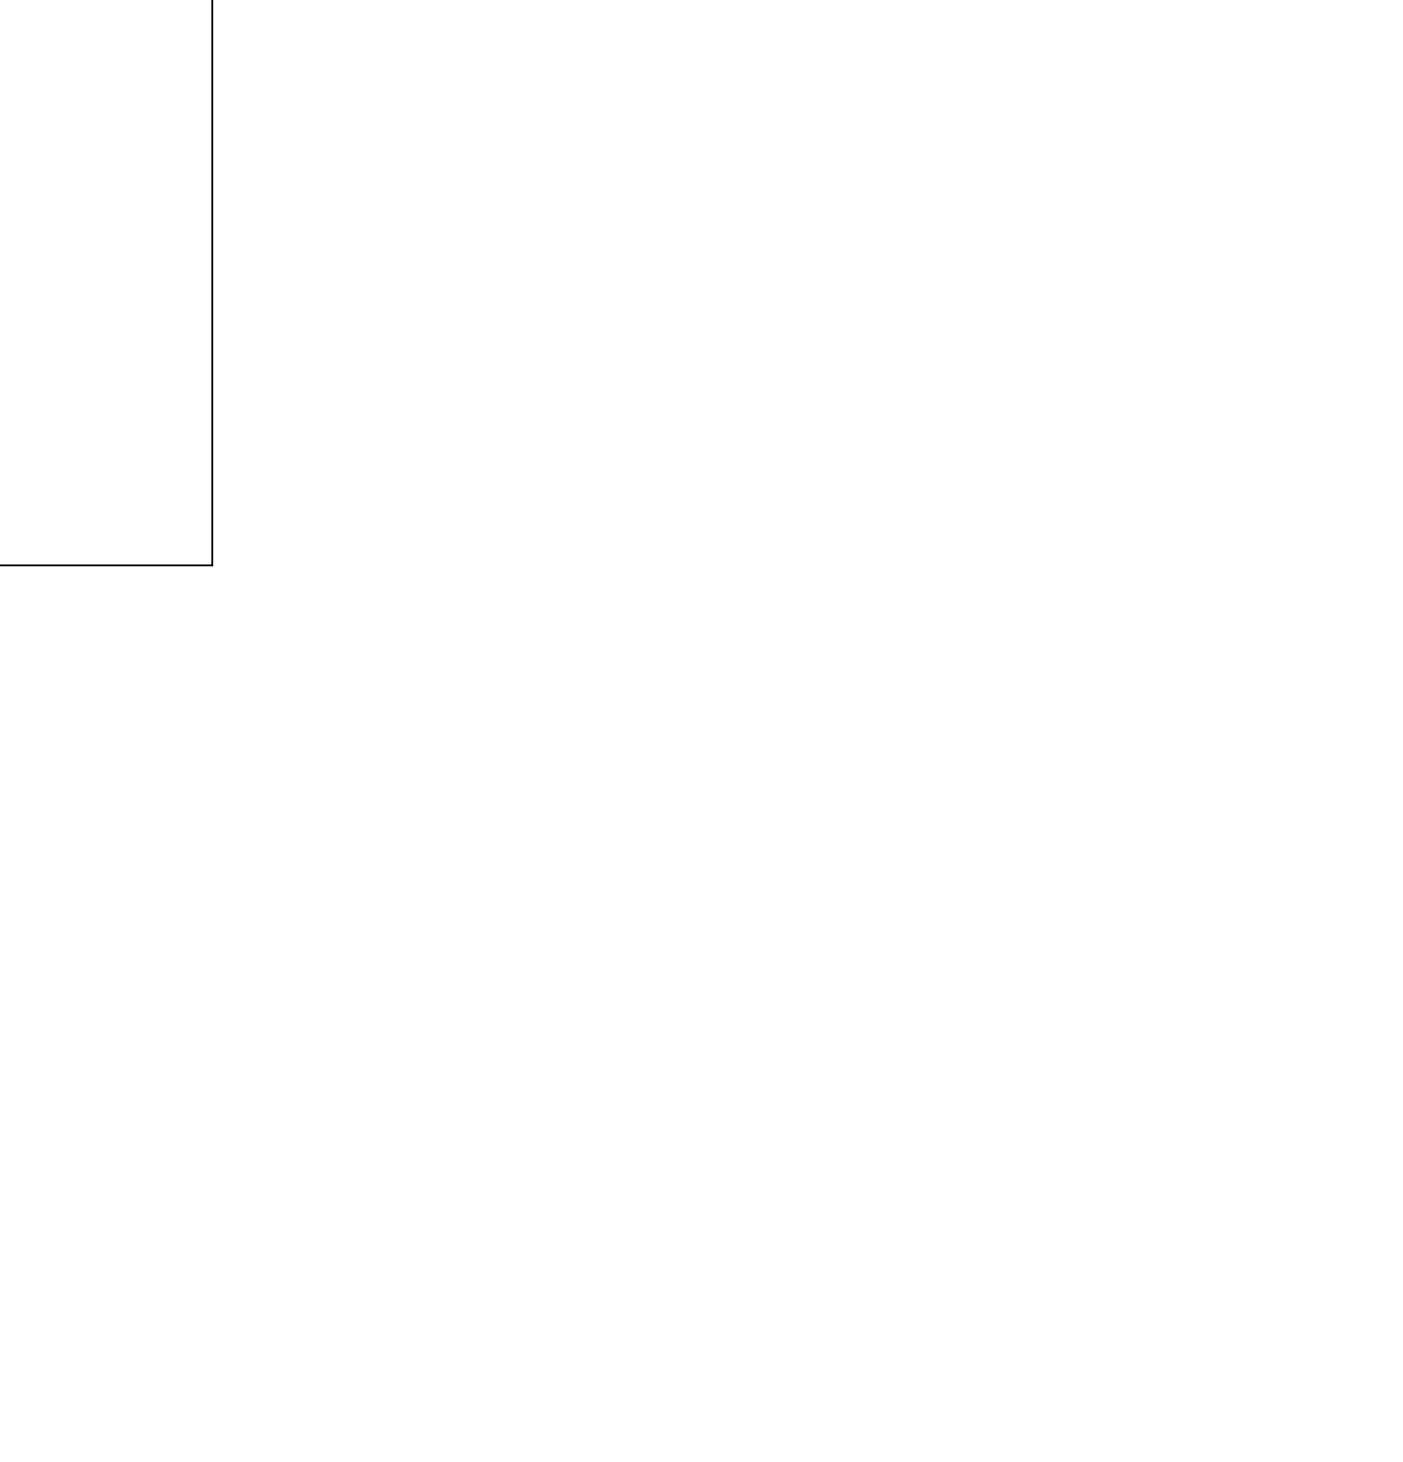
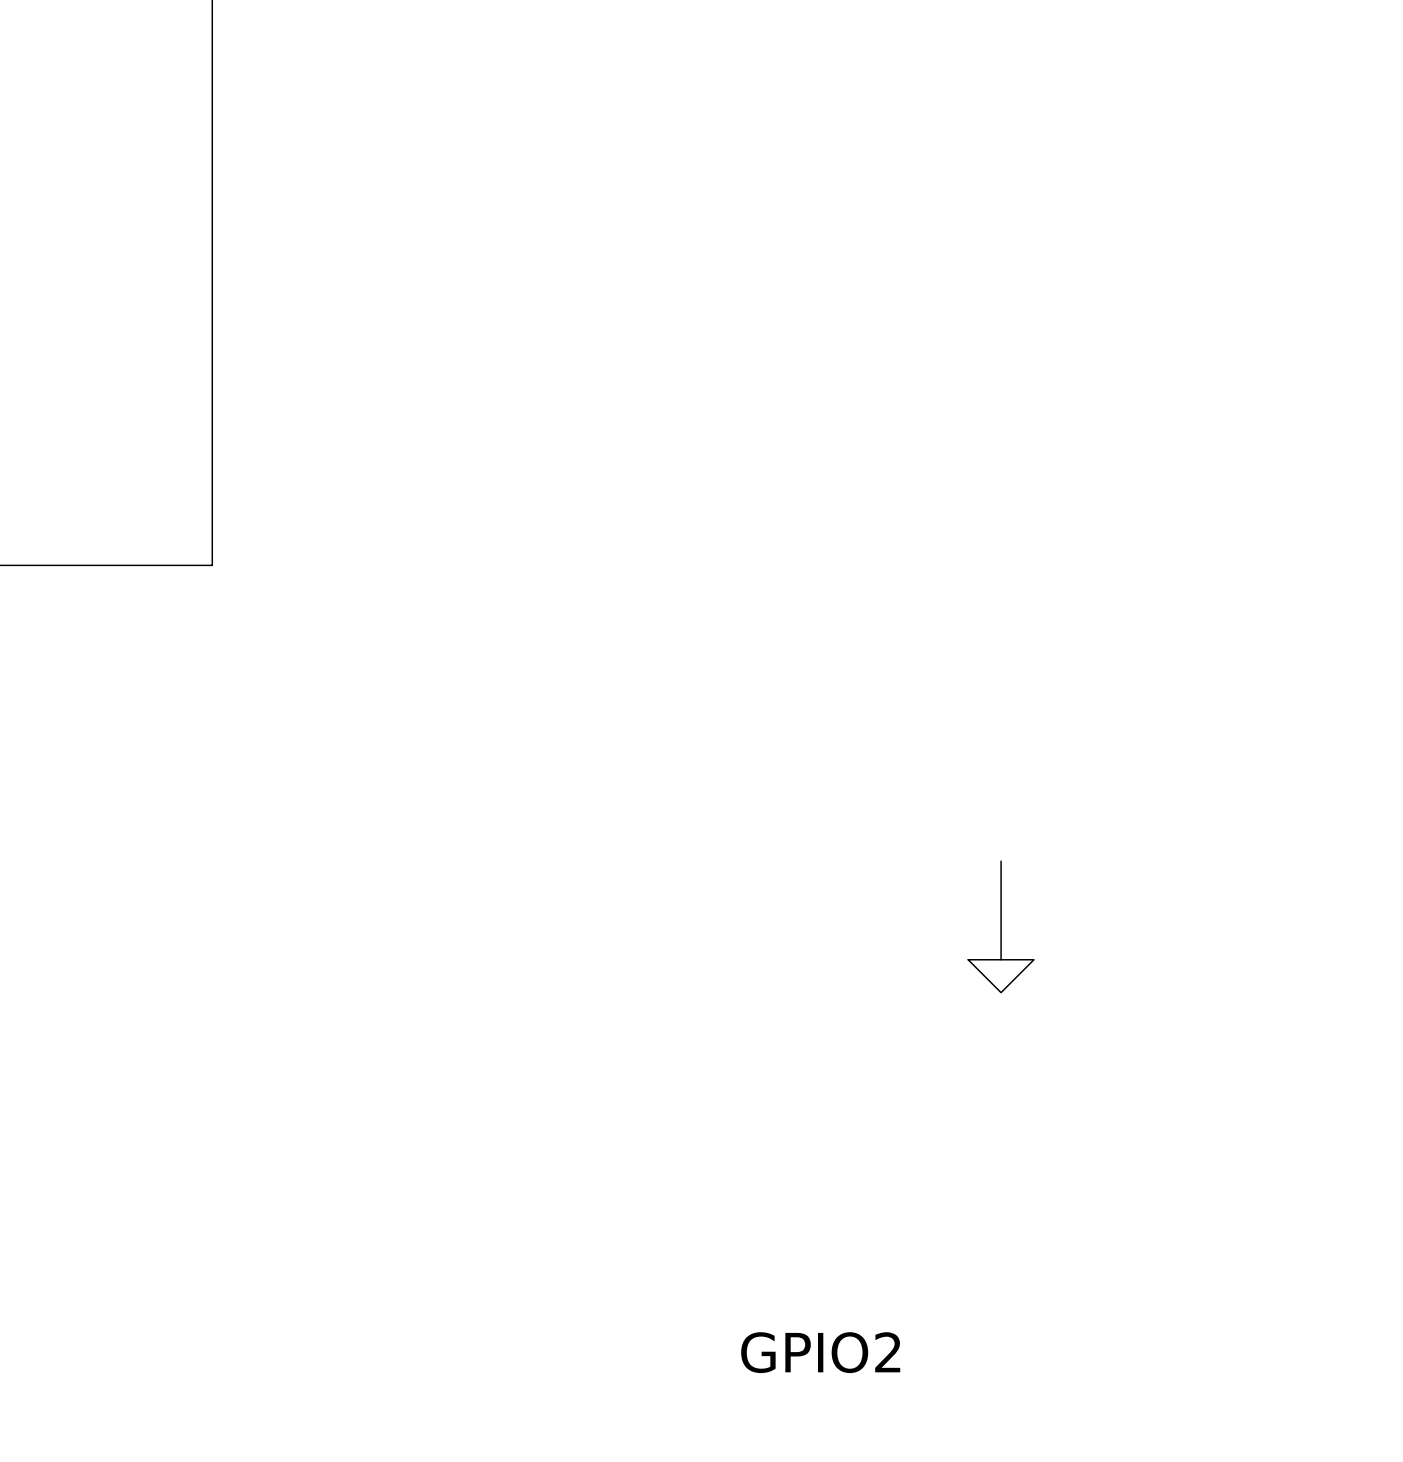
wire: none -> (1001, 861) (1001, 959)
power symbol: none -> (1001, 976)
label: none -> GPIO2 (820, 1352)

